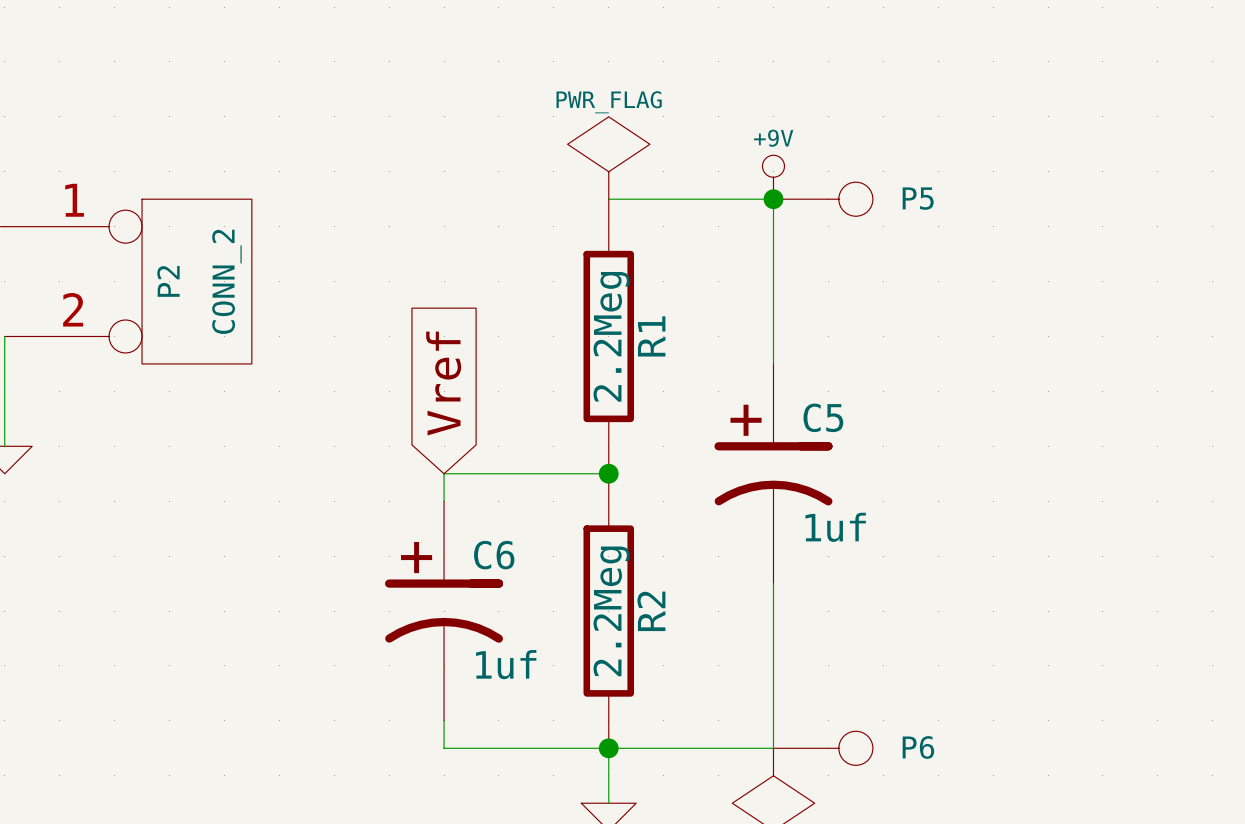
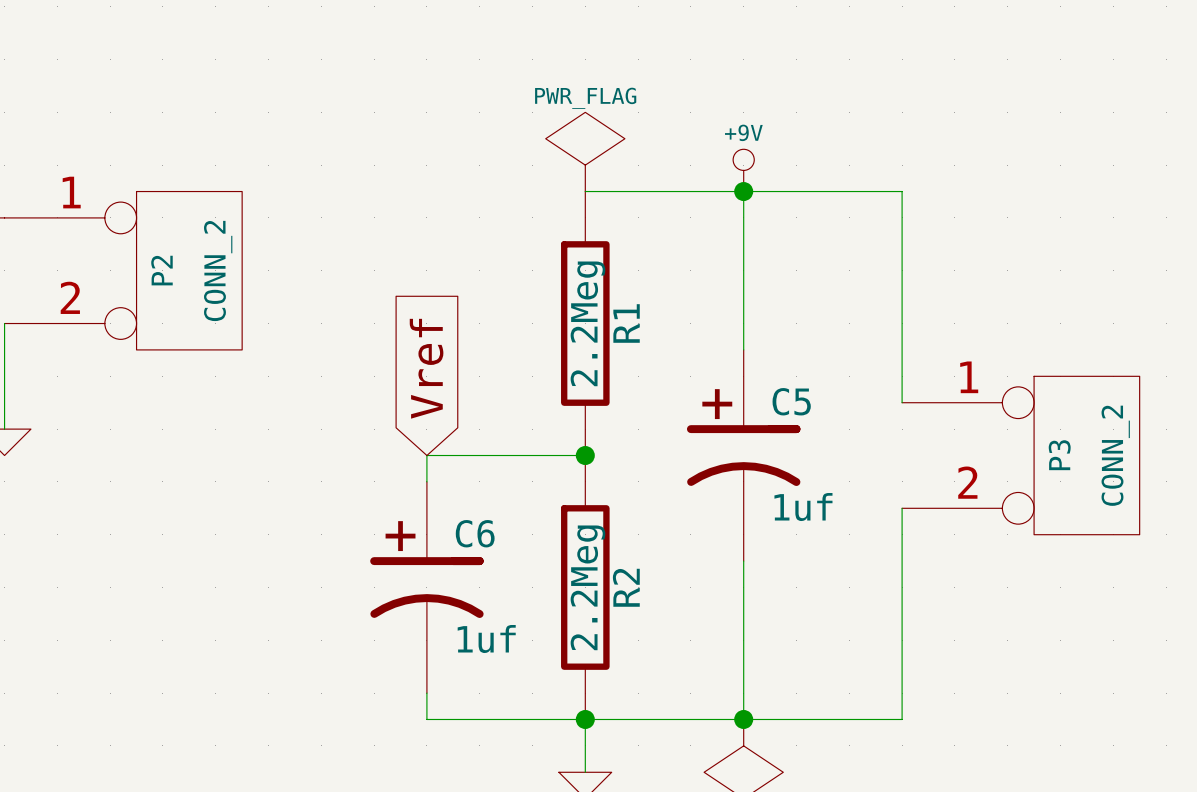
wire: none -> (743, 191) (902, 191) (902, 402)
P5: (823, 199) -> none
P3: none -> CONN_2 (1020, 455)
wire: none -> (902, 508) (902, 719) (743, 719)
junction: none -> (743, 719)
P6: (823, 748) -> none

